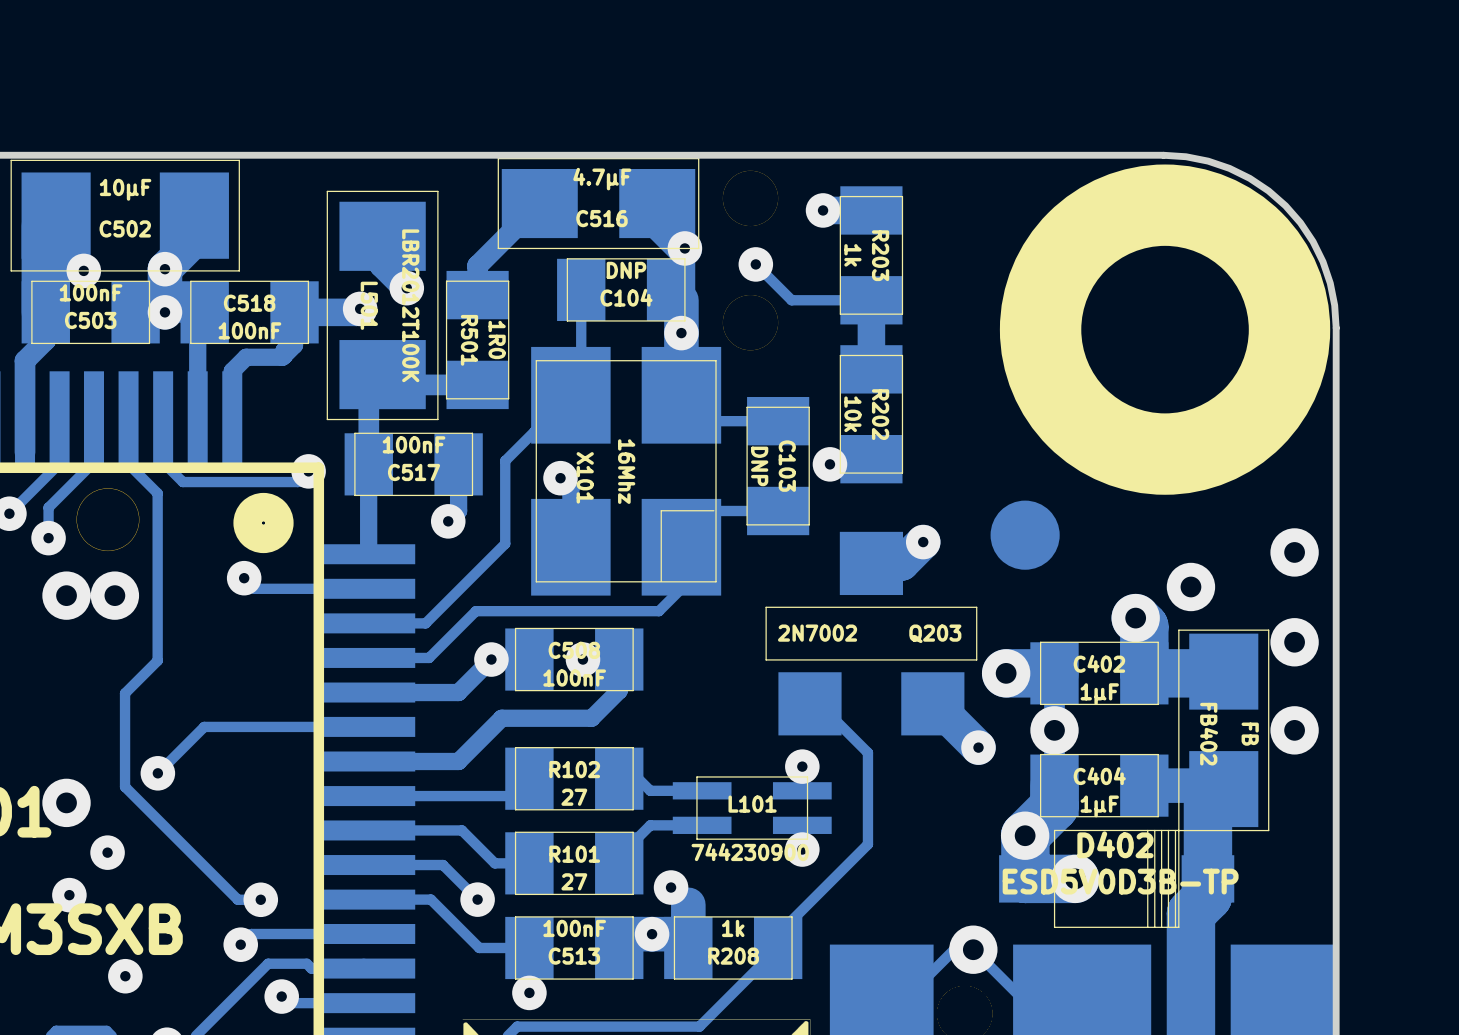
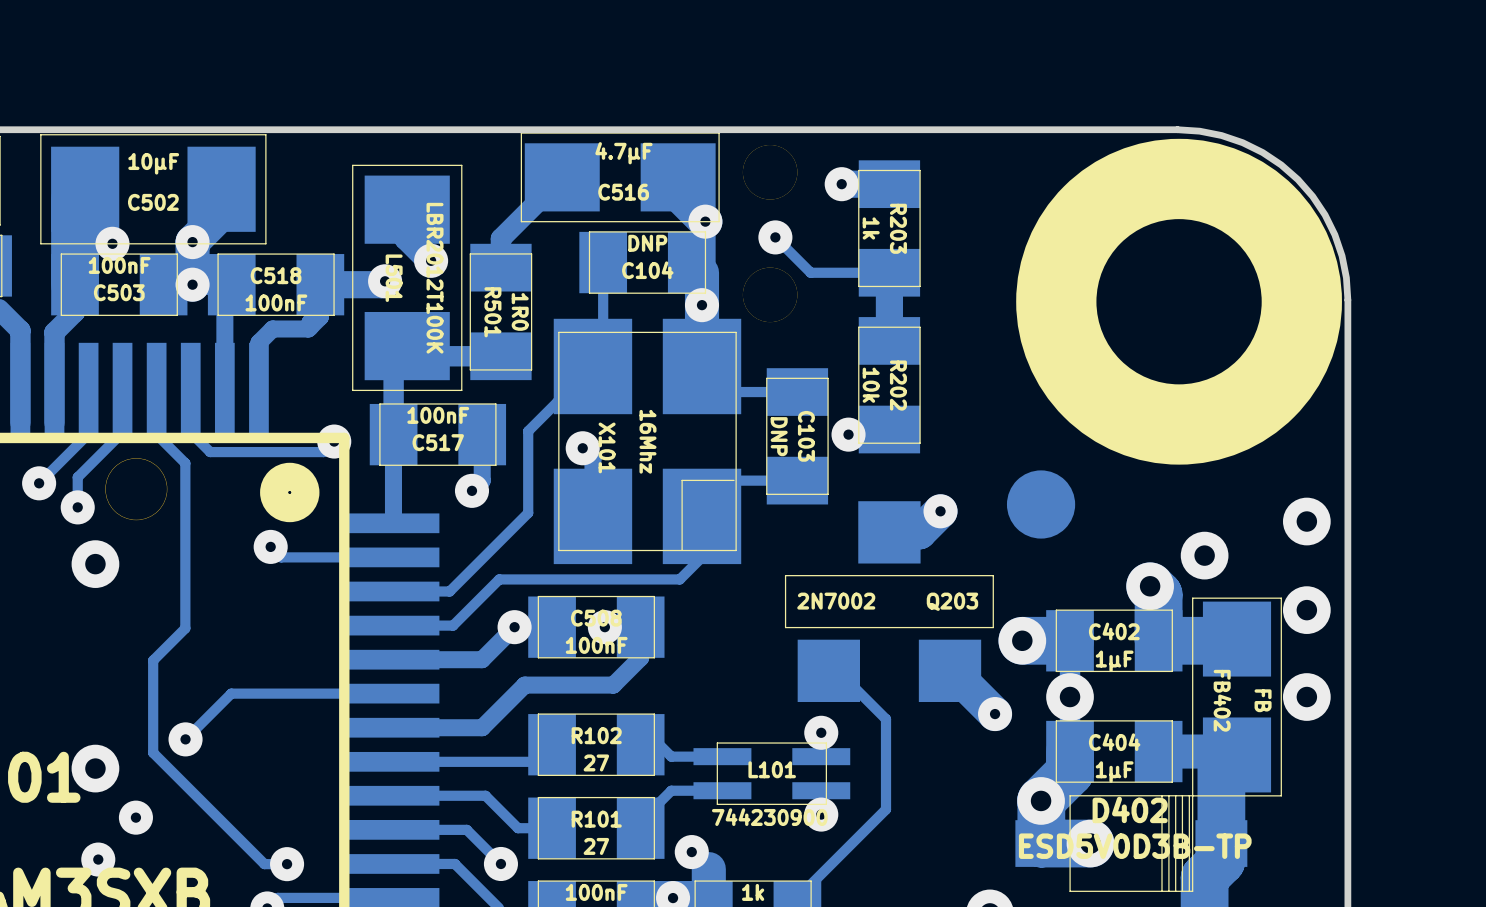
via: (114, 595) -> none

